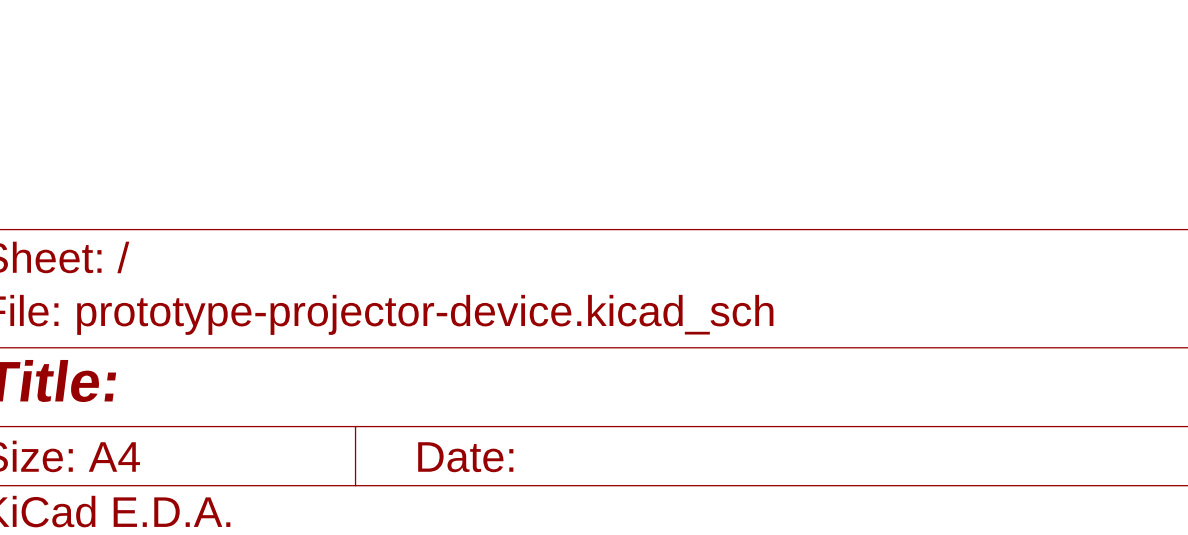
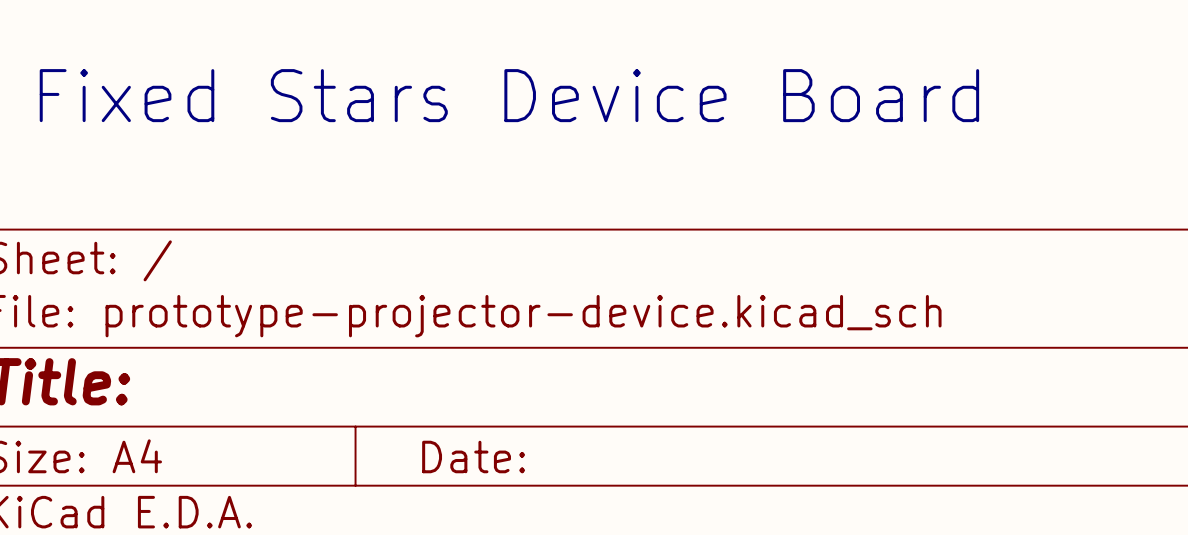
text: none -> Fixed Stars Device Board (509, 95)

